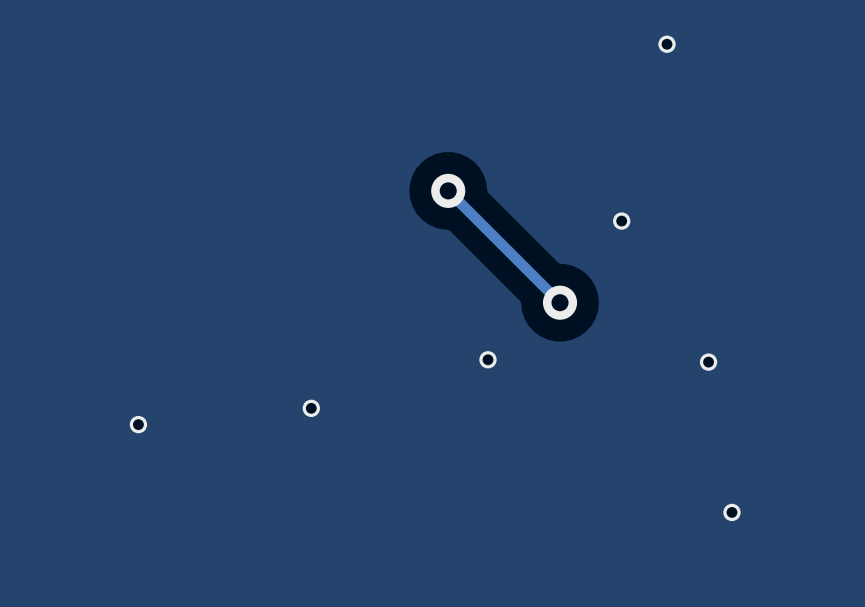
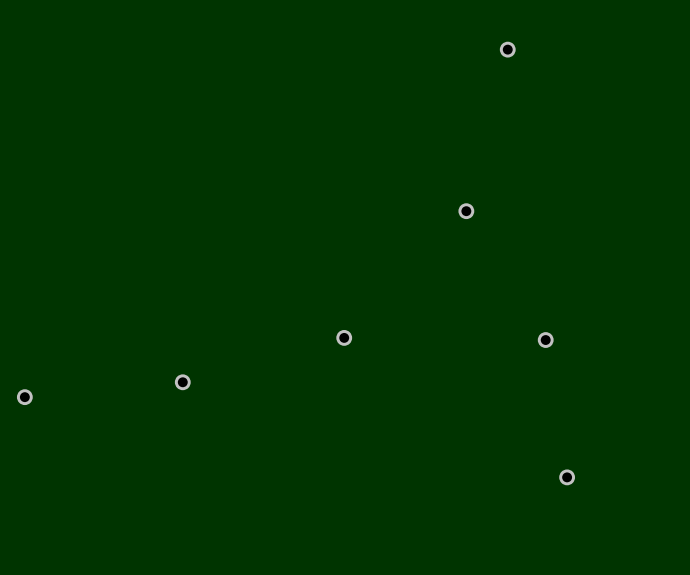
track: (448, 190) (560, 302) -> none
via: (448, 190) -> none
via: (560, 302) -> none

